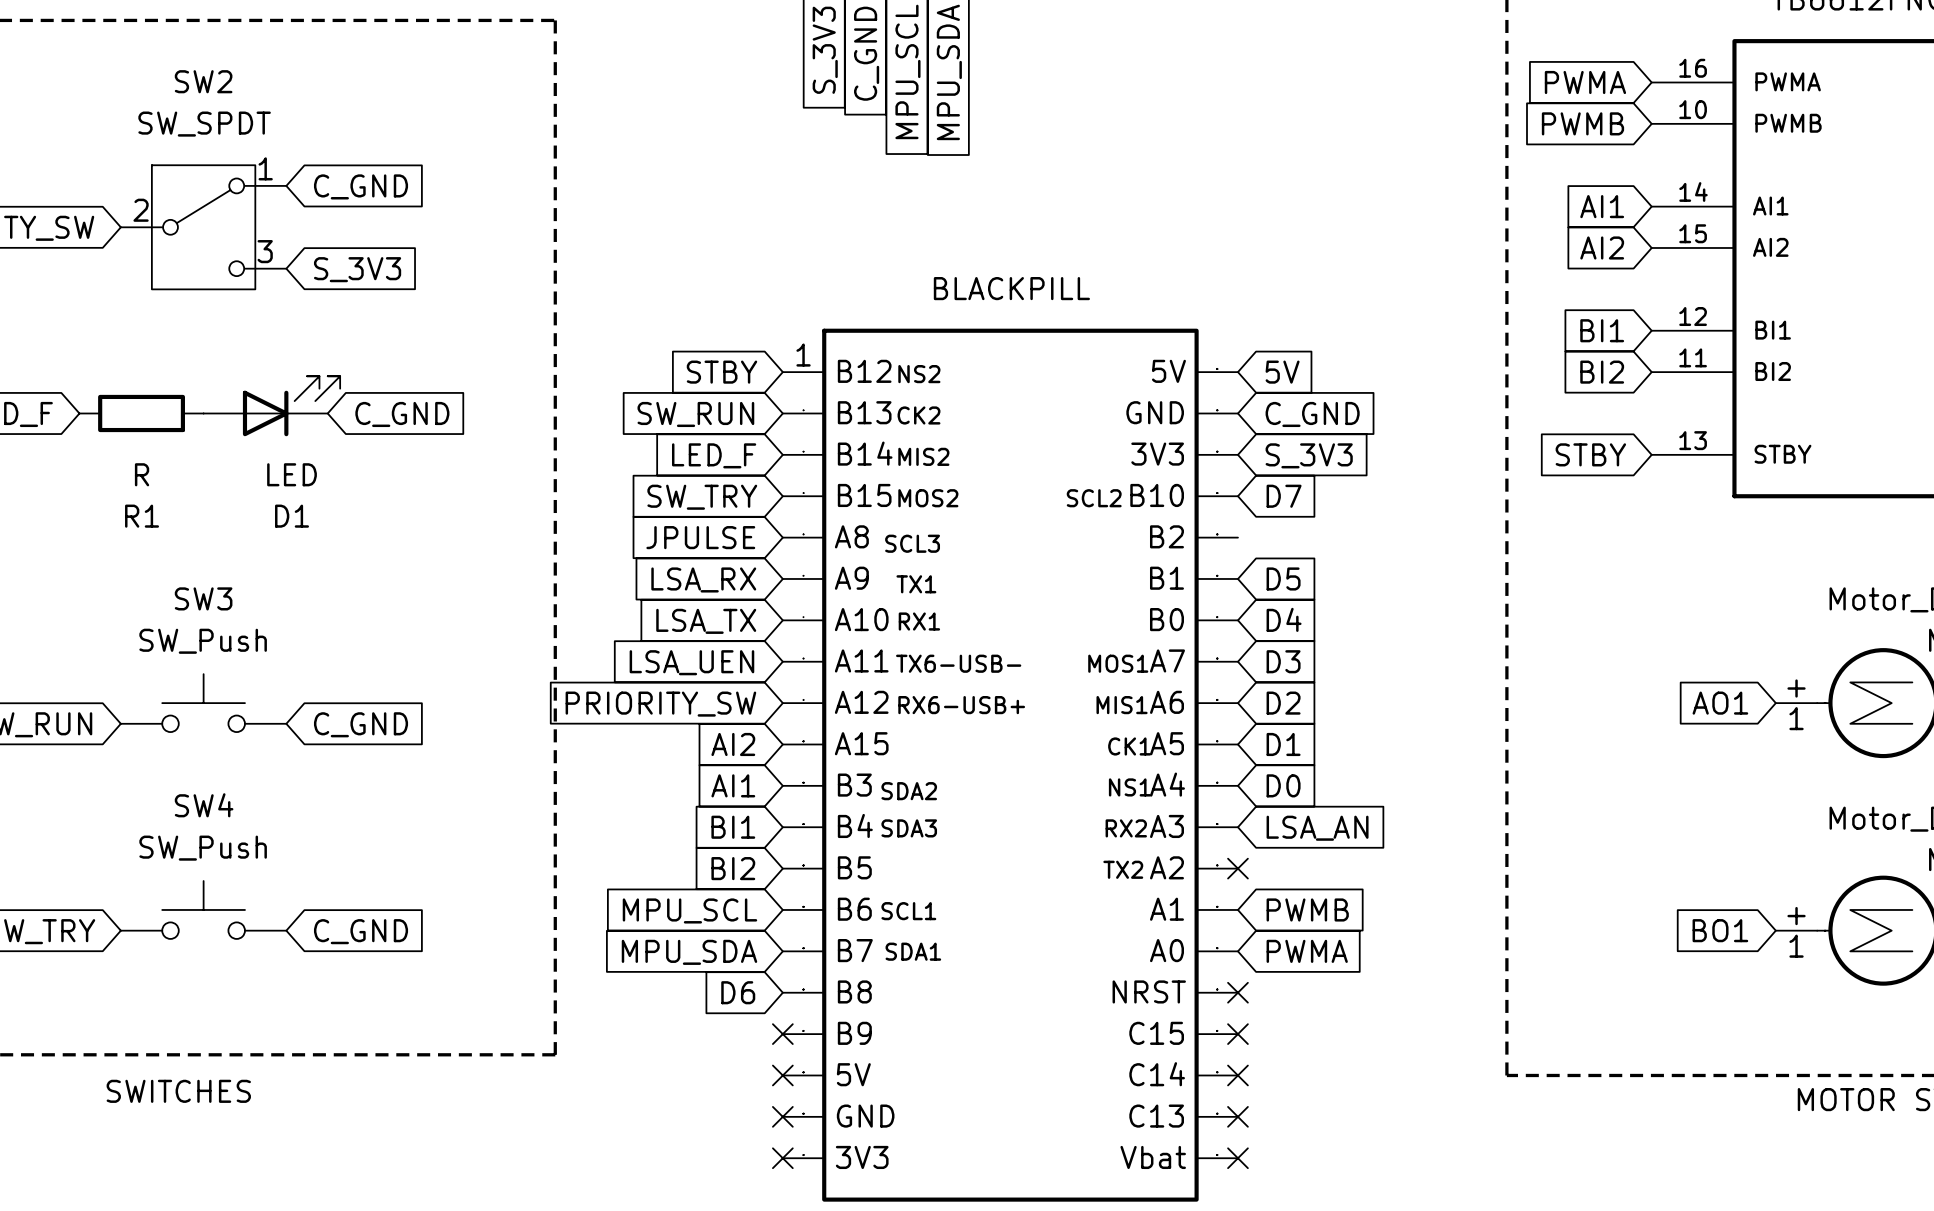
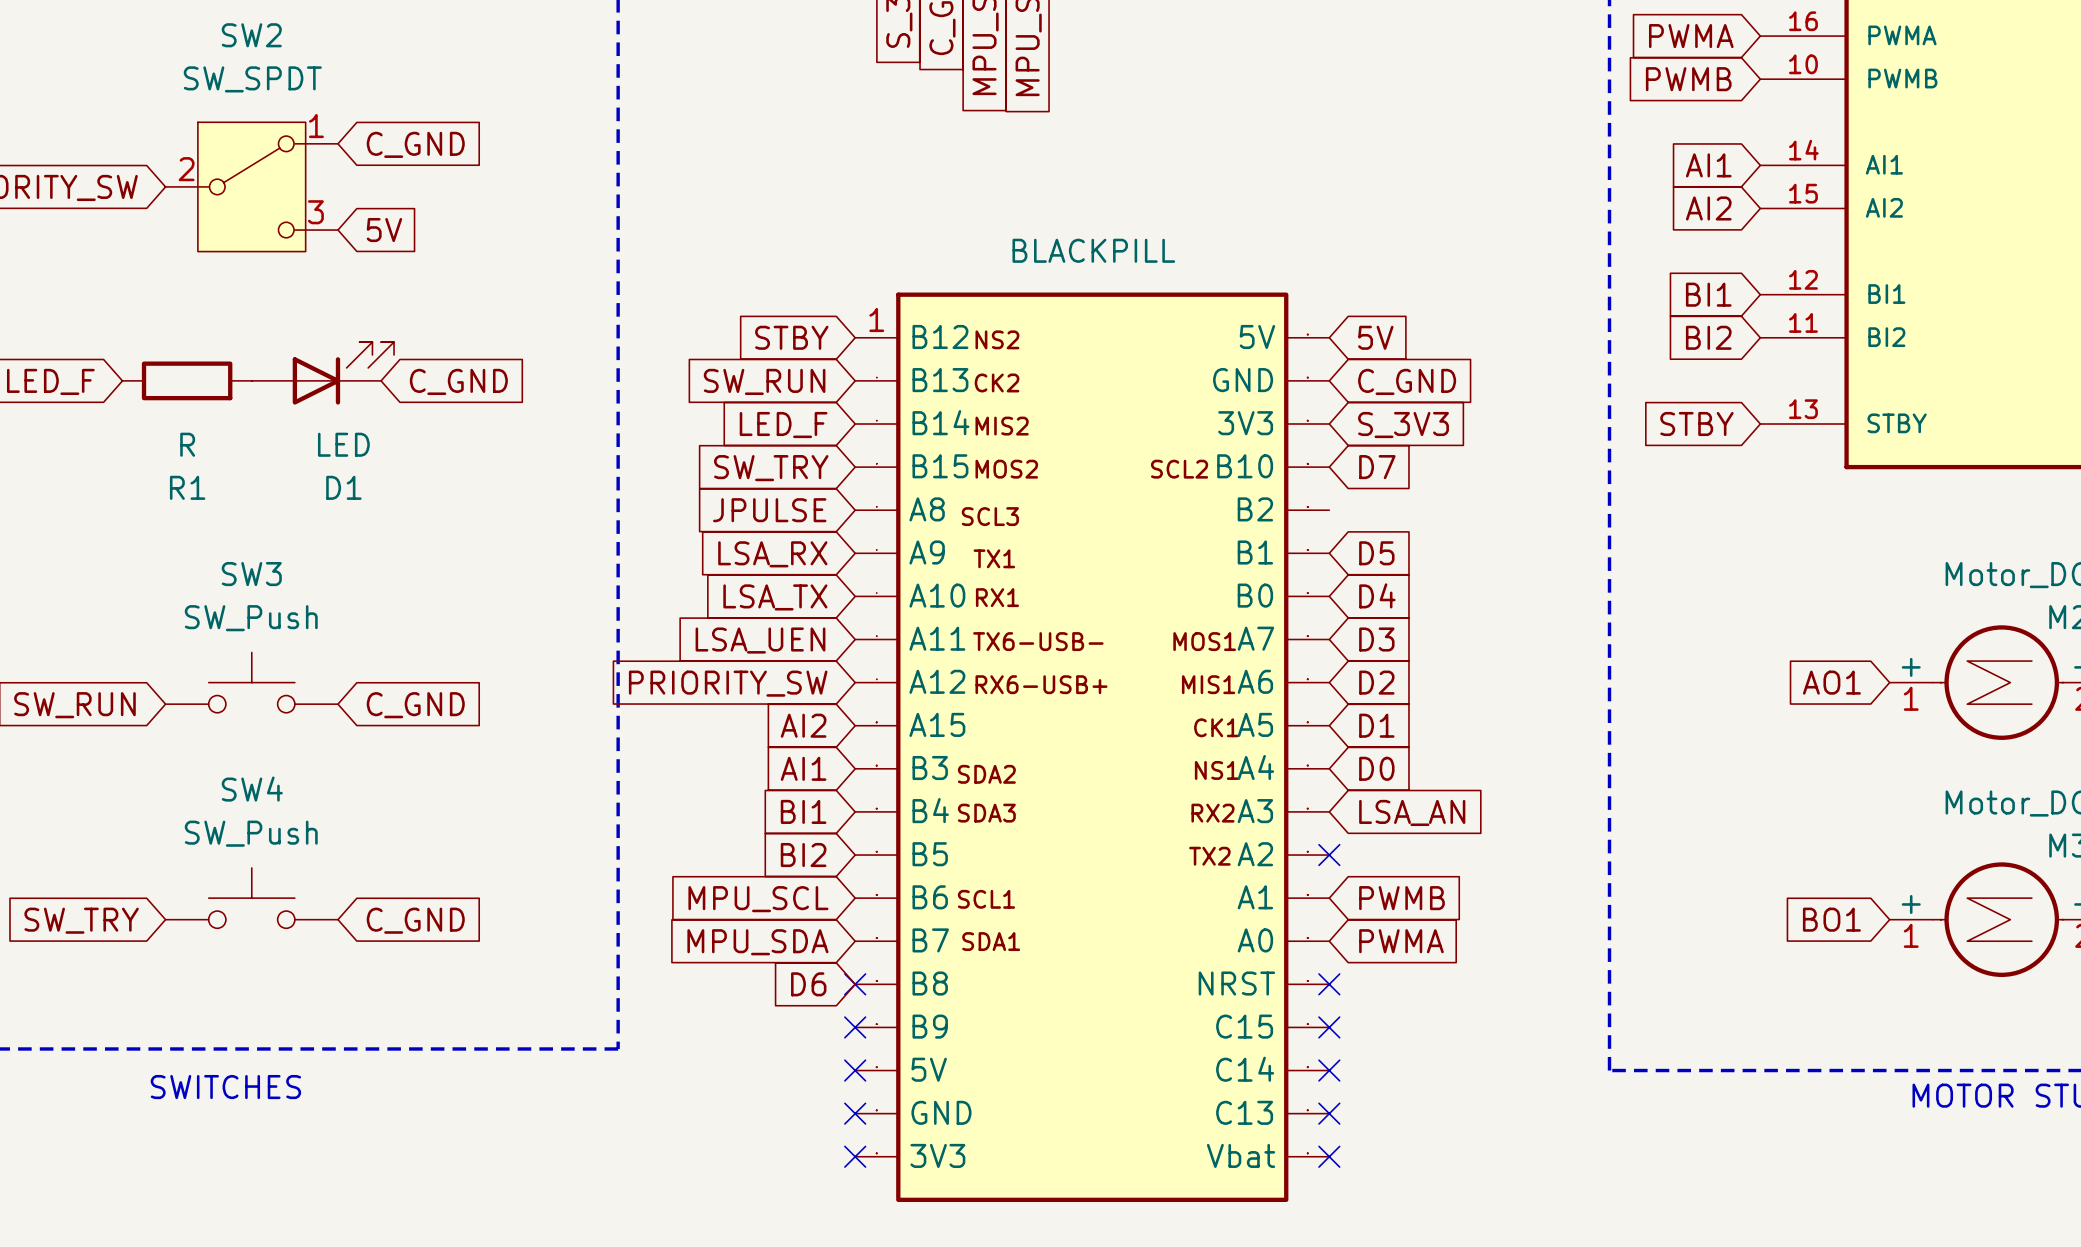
global label: S_3V3 (357, 269) -> 5V (384, 230)
no-connect mark: none -> (855, 984)

